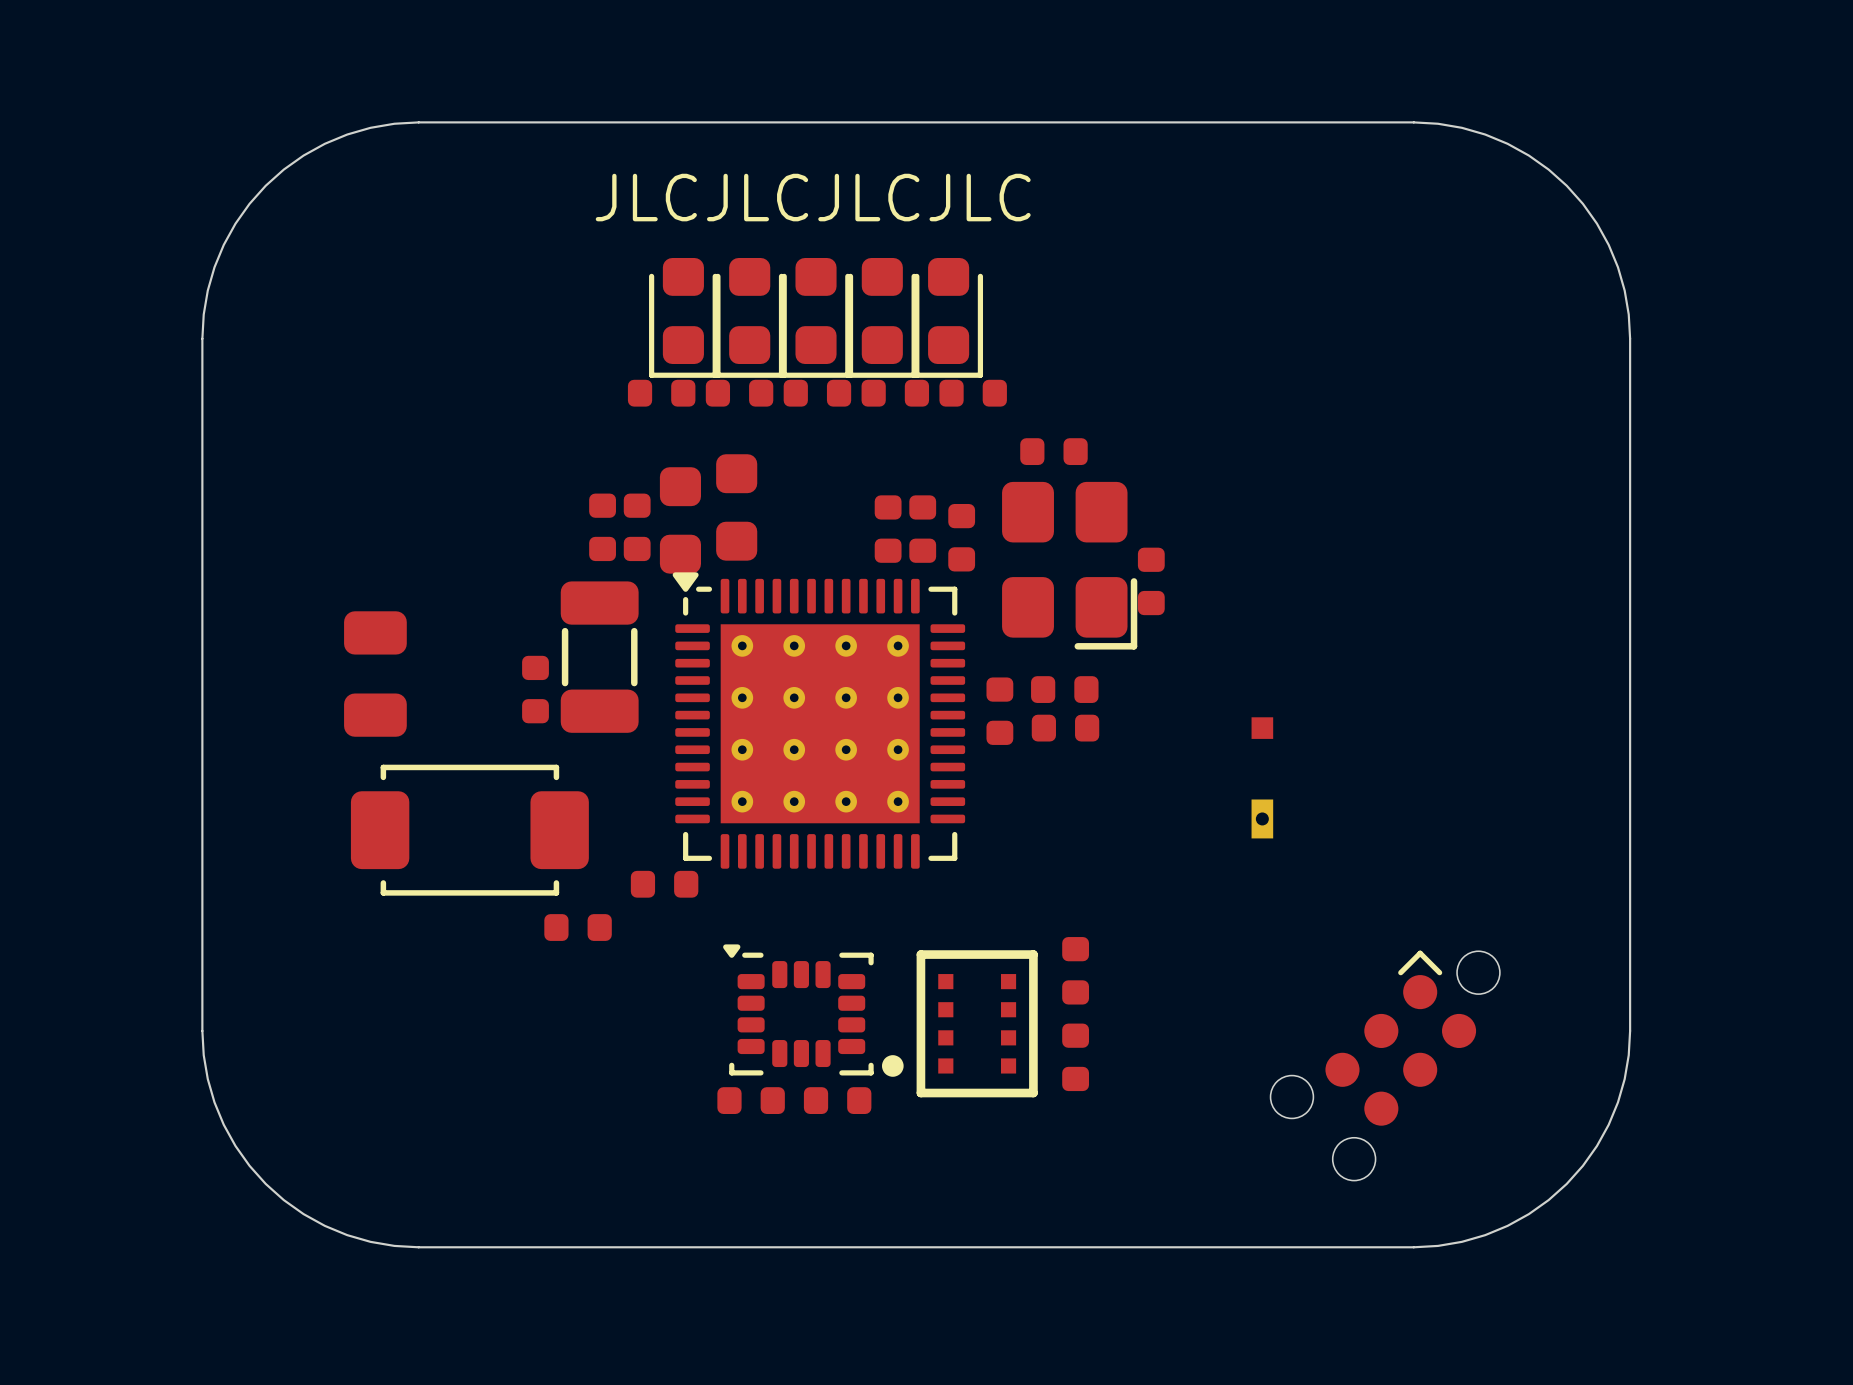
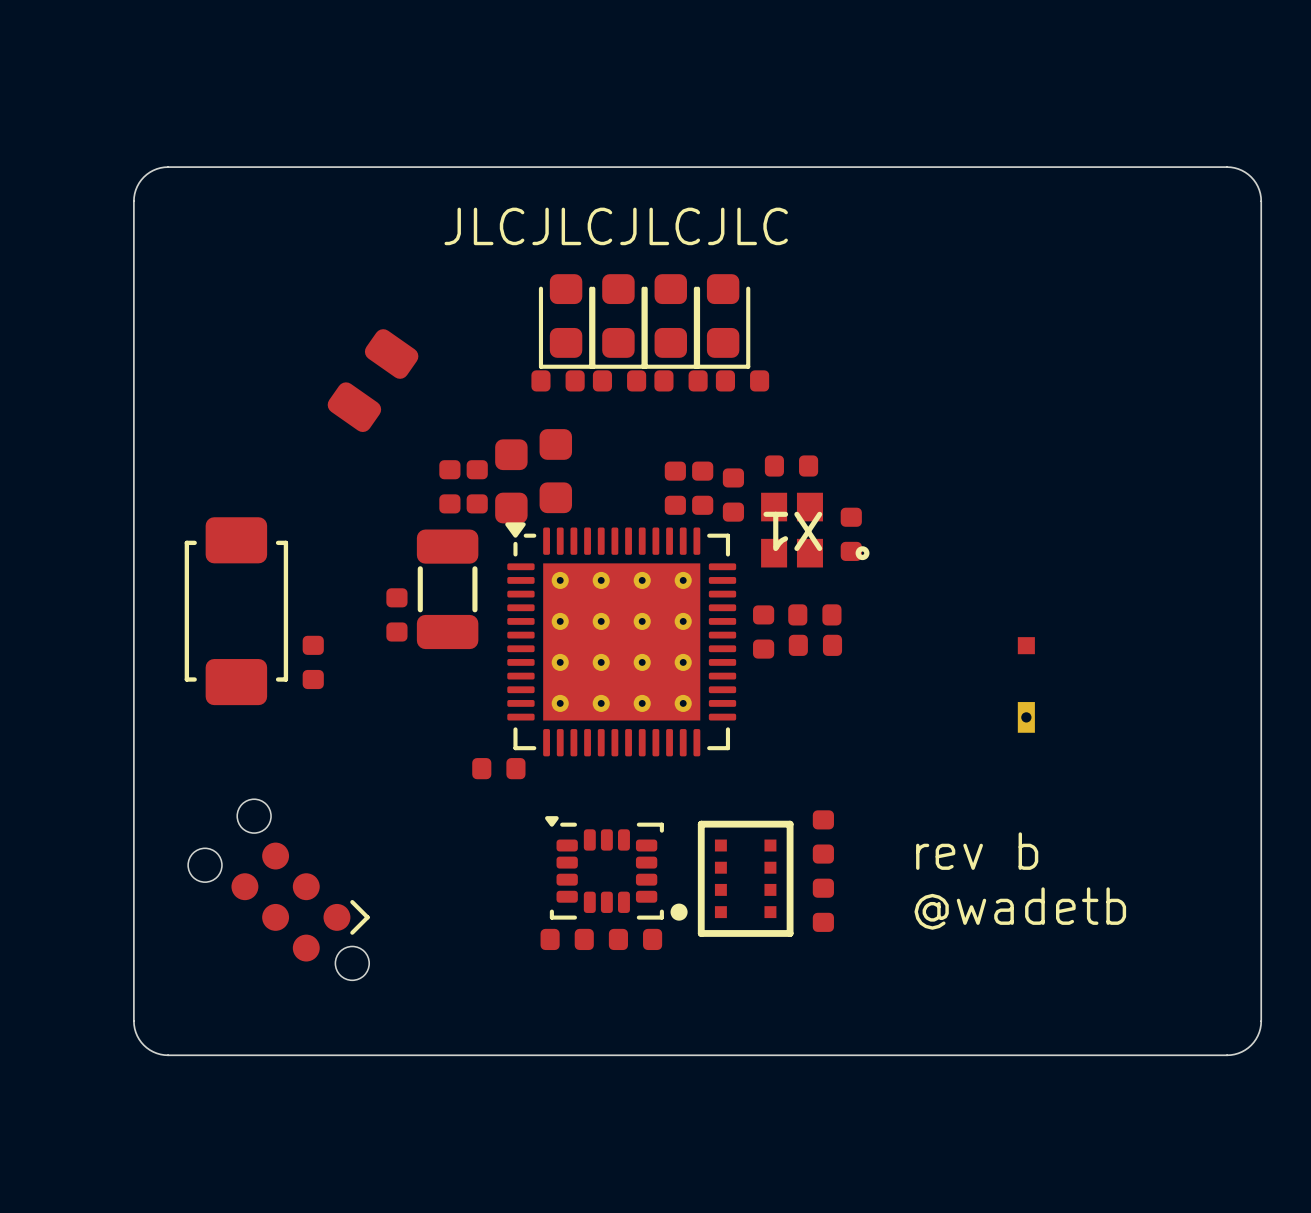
board edge: (418, 122) (370, 127) (324, 143) (303, 155) (265, 185) (235, 223) (214, 267) (207, 290) (202, 338) -> (304, 167) (164, 167) (153, 170) (143, 177) (137, 186) (134, 197) (133, 337)
board edge: (1413, 122) (1461, 127) (1507, 143) (1528, 155) (1566, 185) (1582, 203) (1608, 244) (1624, 290) (1630, 338) -> (1090, 167) (1230, 167) (1241, 170) (1251, 177) (1257, 186) (1261, 197) (1261, 337)
part: (683, 317) -> none
part: none -> (373, 380)
part: (661, 393) -> none
part position: (1053, 451) -> (791, 466)
part: (1069, 565) -> none
part position: (1151, 581) -> (851, 534)
X1: none -> (815, 530)
part: (375, 674) -> none
part: none -> (313, 662)
part position: (1262, 777) -> (1026, 684)
part rotation: 0° (469, 830) -> 90° clockwise (236, 611)
part position: (469, 830) -> (236, 611)
part: (578, 927) -> none
text: none -> rev b (977, 851)
board edge: (202, 1030) (207, 1079) (223, 1124) (249, 1165) (265, 1183) (303, 1214) (347, 1235) (370, 1241) (418, 1247) -> (133, 884) (134, 1024) (137, 1035) (143, 1045) (153, 1051) (164, 1055) (304, 1055)
board edge: (1630, 1030) (1628, 1055) (1617, 1102) (1596, 1146) (1566, 1183) (1548, 1200) (1507, 1225) (1461, 1241) (1413, 1247) -> (1261, 884) (1261, 1024) (1257, 1035) (1251, 1045) (1241, 1051) (1230, 1055) (1090, 1055)
text: none -> @wadetb (1020, 908)
part rotation: 0° (1385, 1065) -> 90° clockwise (278, 889)
part position: (1385, 1065) -> (278, 889)

